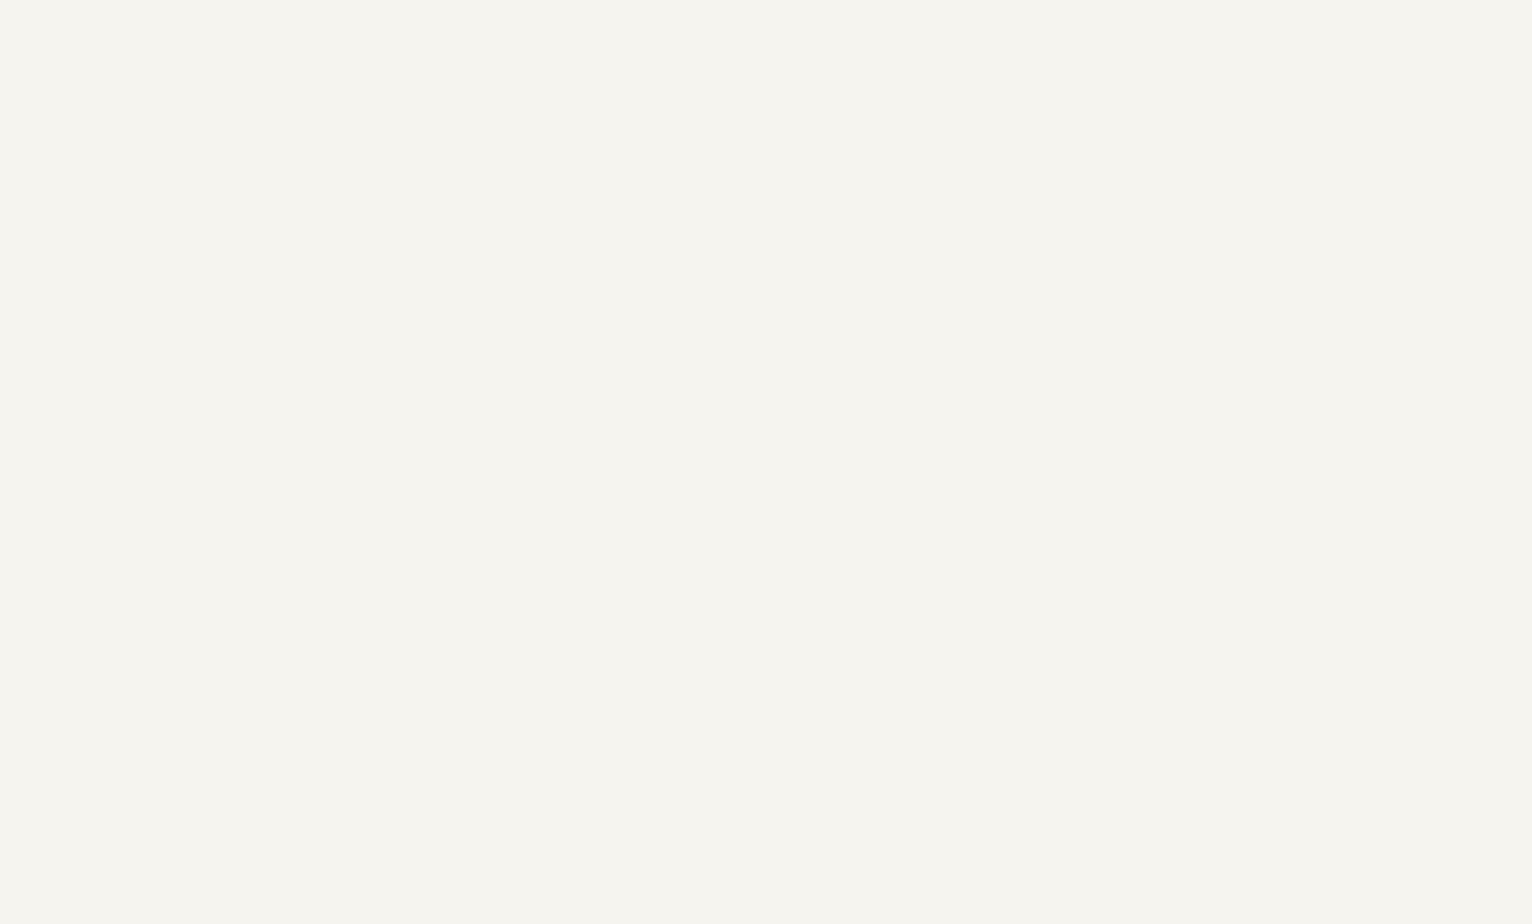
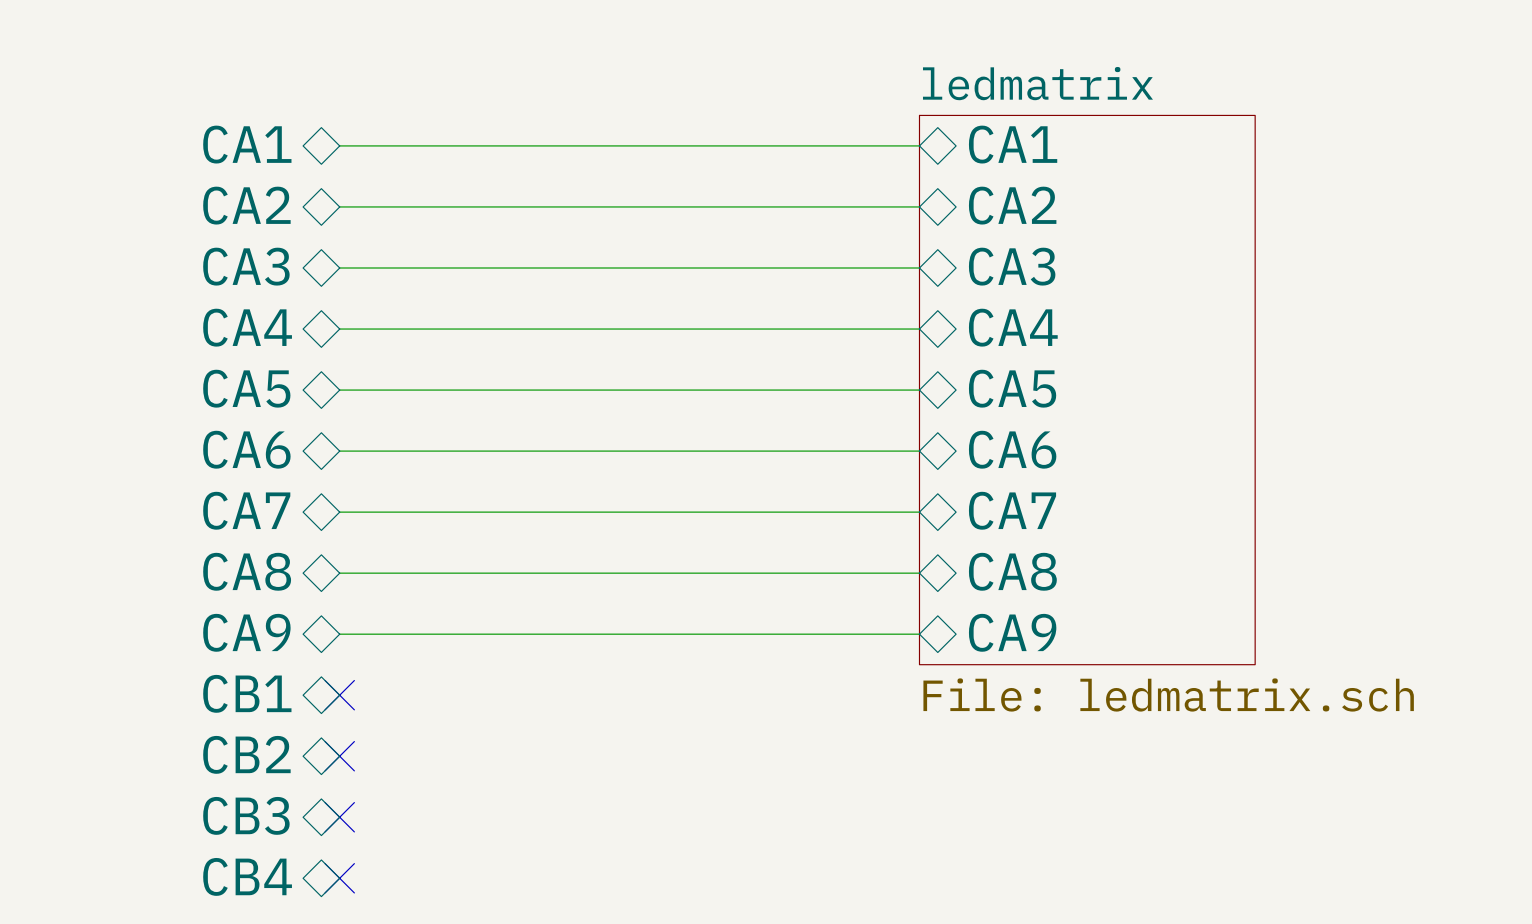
sheet pin: none -> CA1 (247, 144)
sheet pin: none -> CA1 (1013, 144)
wire: none -> (339, 145) (919, 145)
sheet pin: none -> CA2 (246, 205)
sheet pin: none -> CA2 (1012, 205)
wire: none -> (339, 206) (919, 206)
sheet pin: none -> CA3 (246, 266)
sheet pin: none -> CA3 (1012, 266)
wire: none -> (339, 267) (919, 267)
sheet pin: none -> CA4 (247, 327)
sheet pin: none -> CA4 (1013, 327)
wire: none -> (339, 329) (919, 329)
sheet pin: none -> CA5 (246, 388)
sheet pin: none -> CA5 (1012, 388)
wire: none -> (339, 390) (919, 390)
sheet ledmatrix: none -> File: ledmatrix.sch (1087, 390)
sheet pin: none -> CA6 (246, 449)
sheet pin: none -> CA6 (1012, 449)
wire: none -> (339, 451) (919, 451)
sheet pin: none -> CA7 (246, 510)
sheet pin: none -> CA7 (1012, 510)
wire: none -> (339, 512) (919, 512)
sheet pin: none -> CA8 (247, 571)
sheet pin: none -> CA8 (1012, 571)
wire: none -> (339, 573) (919, 573)
sheet pin: none -> CA9 (246, 632)
sheet pin: none -> CA9 (1012, 632)
wire: none -> (339, 634) (919, 634)
sheet pin: none -> CB1 (247, 693)
no-connect mark: none -> (339, 695)
sheet pin: none -> CB2 (246, 754)
no-connect mark: none -> (339, 756)
sheet pin: none -> CB3 (246, 815)
no-connect mark: none -> (339, 817)
sheet pin: none -> CB4 (247, 876)
no-connect mark: none -> (339, 878)

